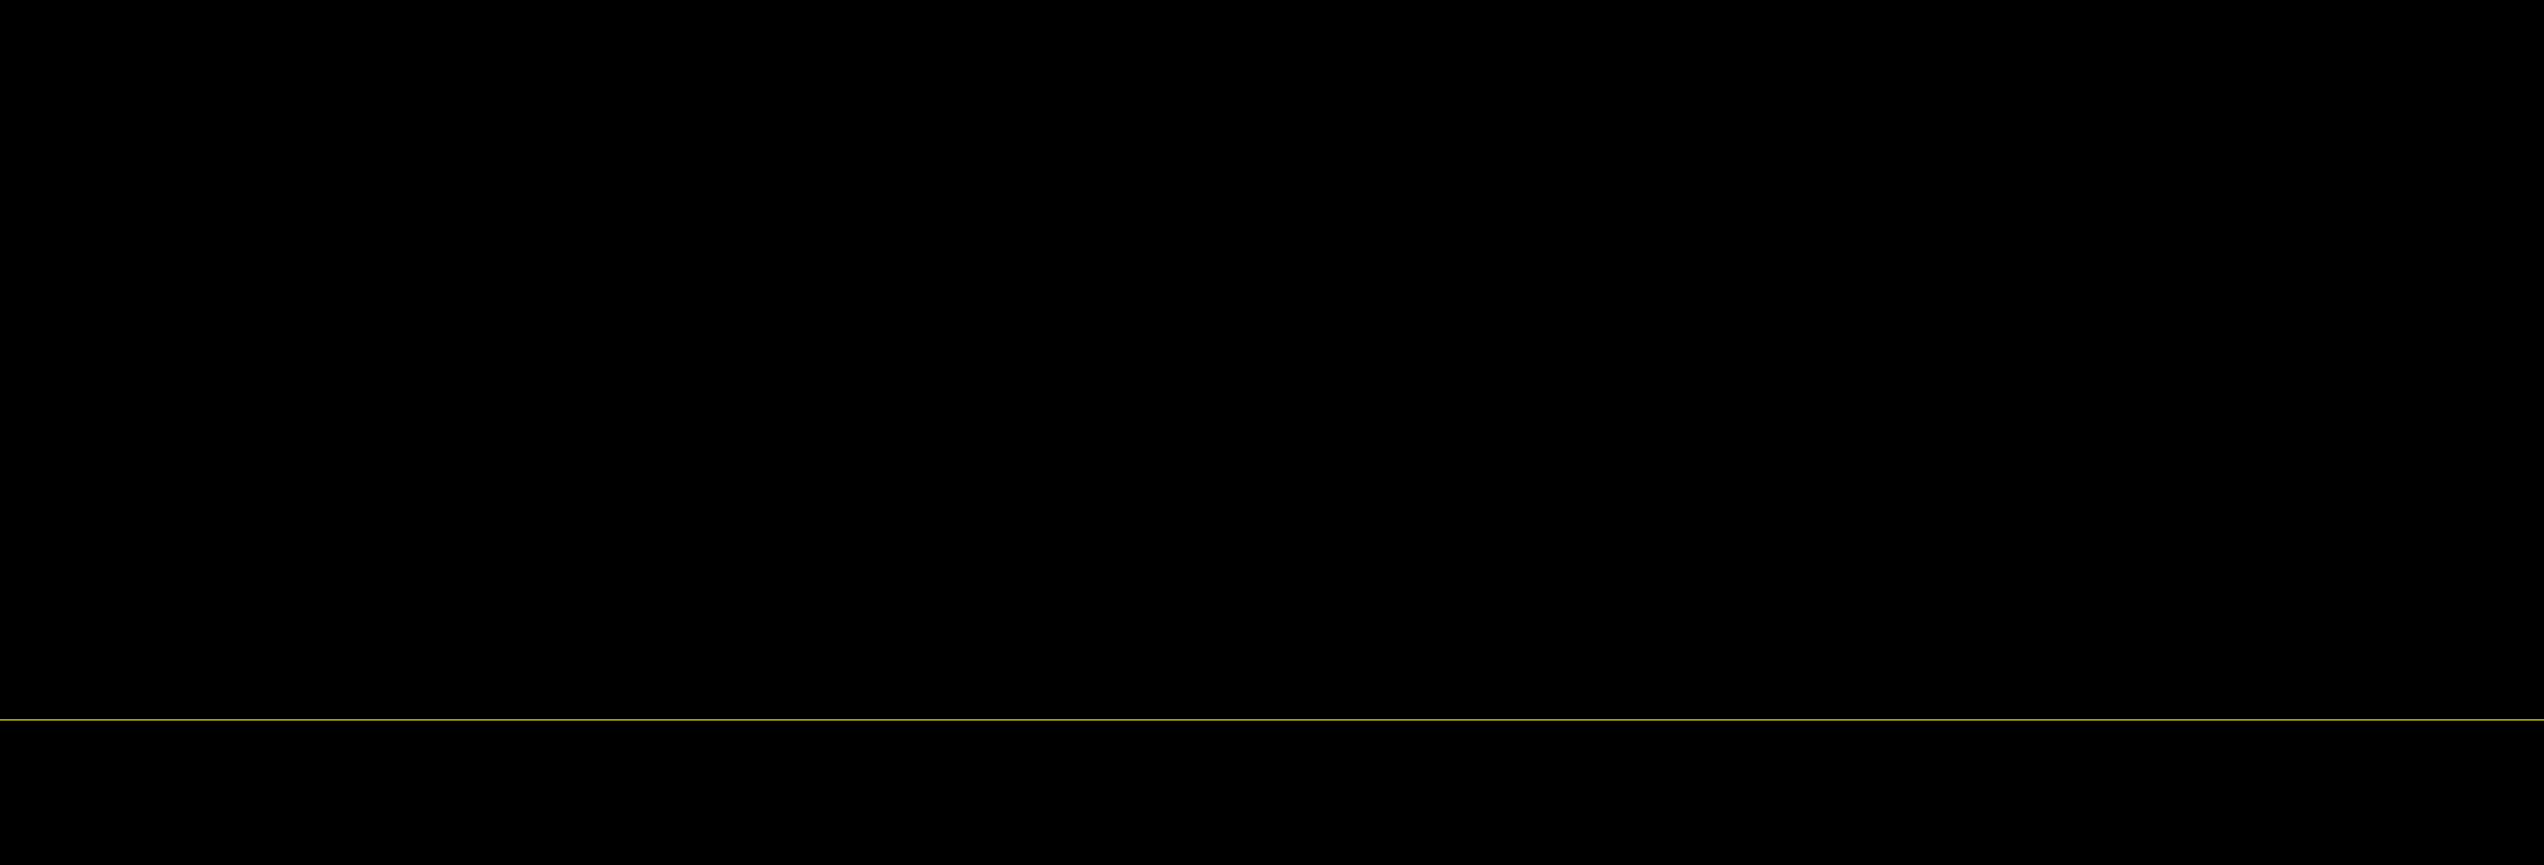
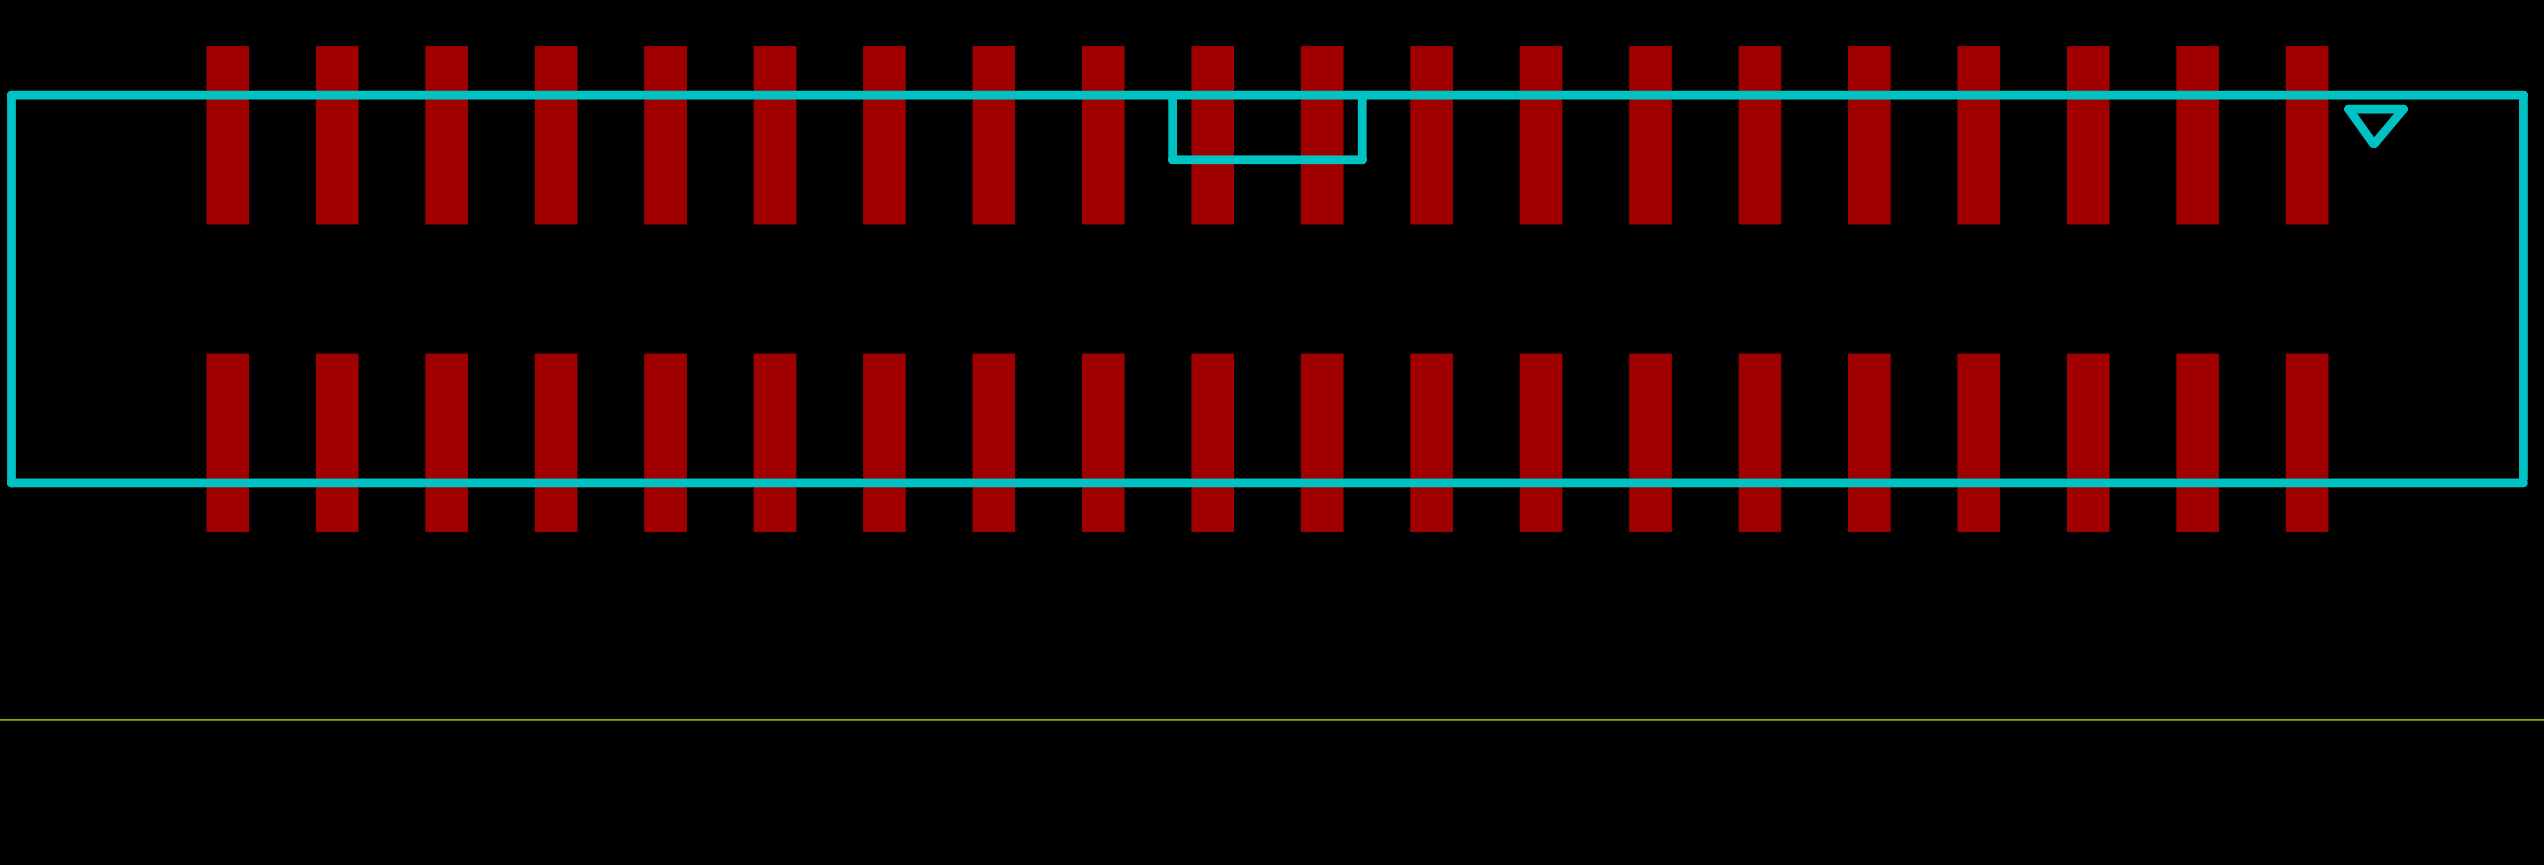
part: none -> (1267, 289)

